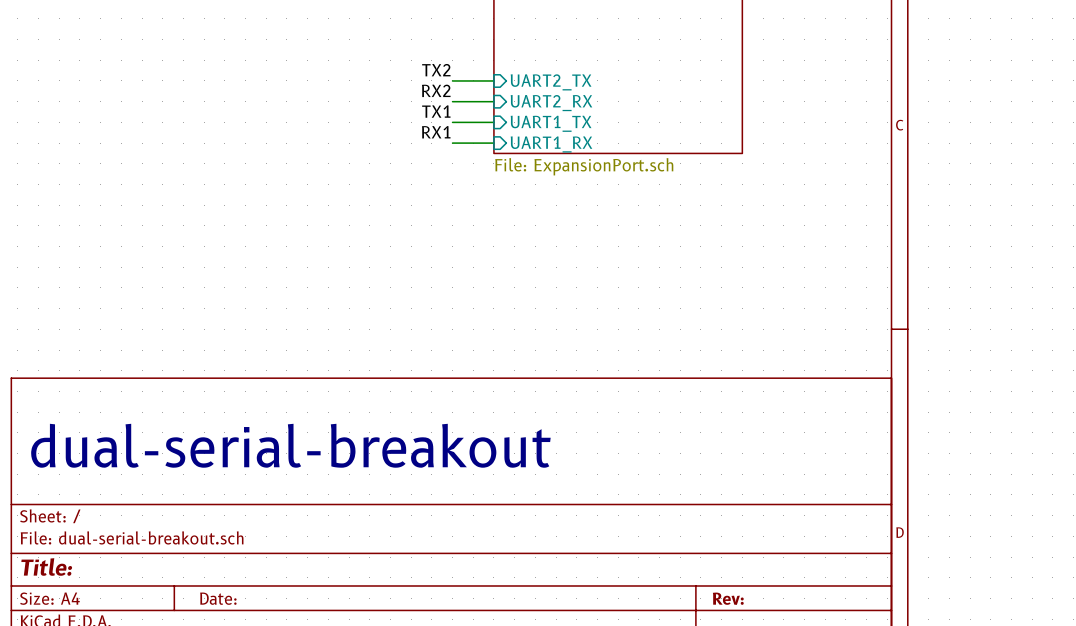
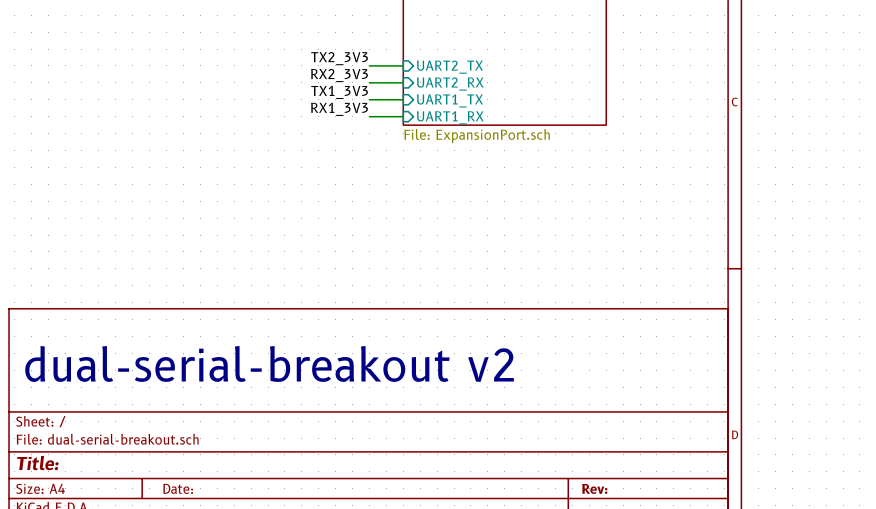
label: TX2 (436, 70) -> TX2_3V3 (339, 58)
label: RX2 (436, 90) -> RX2_3V3 (339, 75)
label: TX1 (436, 111) -> TX1_3V3 (339, 92)
label: RX1 (436, 132) -> RX1_3V3 (339, 109)
text: dual-serial-breakout (290, 445) -> dual-serial-breakout v2 (269, 363)

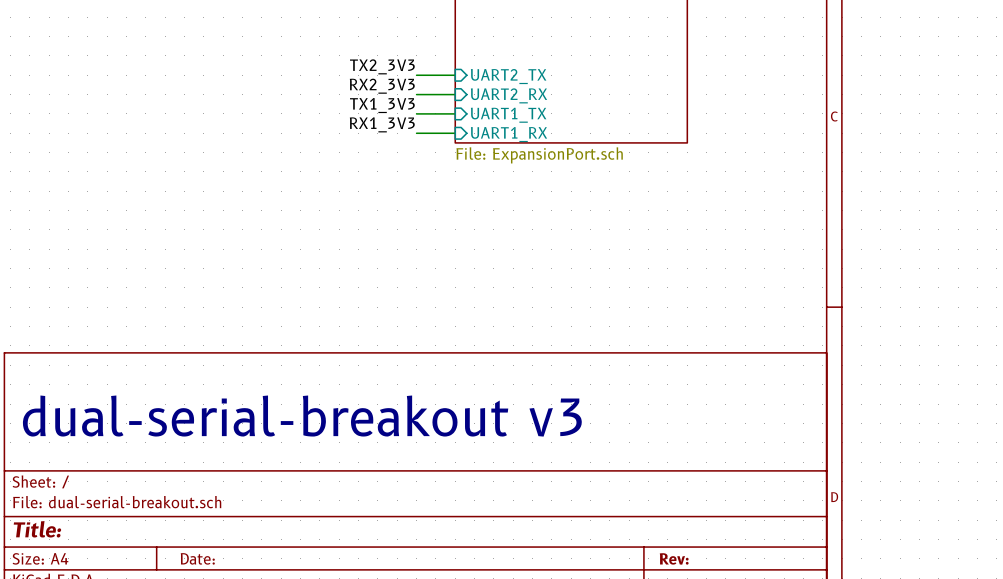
text: dual-serial-breakout v2 (269, 363) -> dual-serial-breakout v3 (302, 416)

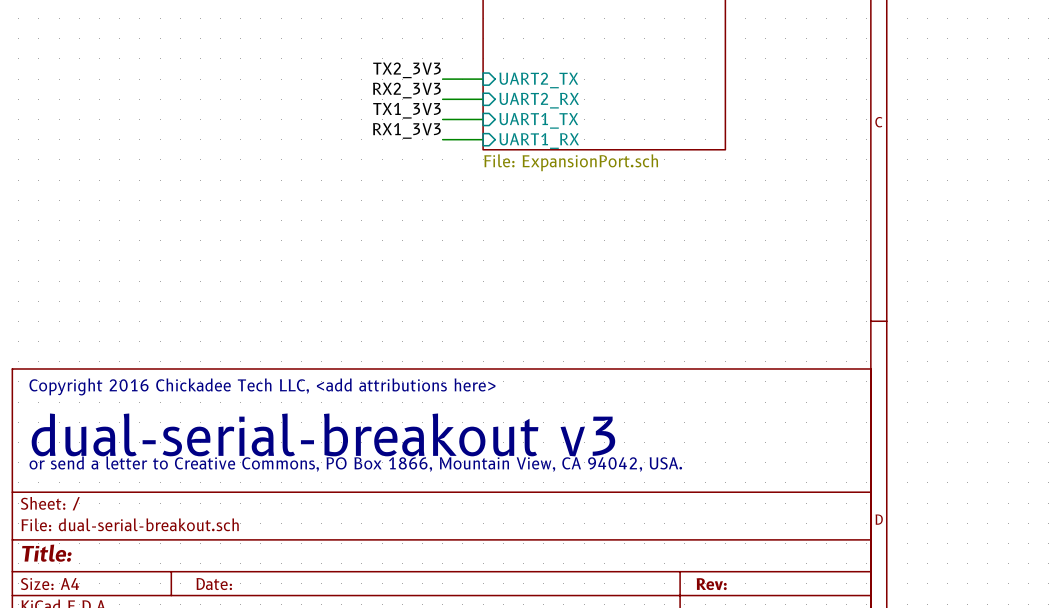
text: none -> Copyright 2016 Chickadee Tech LLC, <add attributions here> (262, 386)
text: none -> or send a letter to Creative Commons, PO Box 1866, Mountain View, CA 94042, USA. (355, 464)

